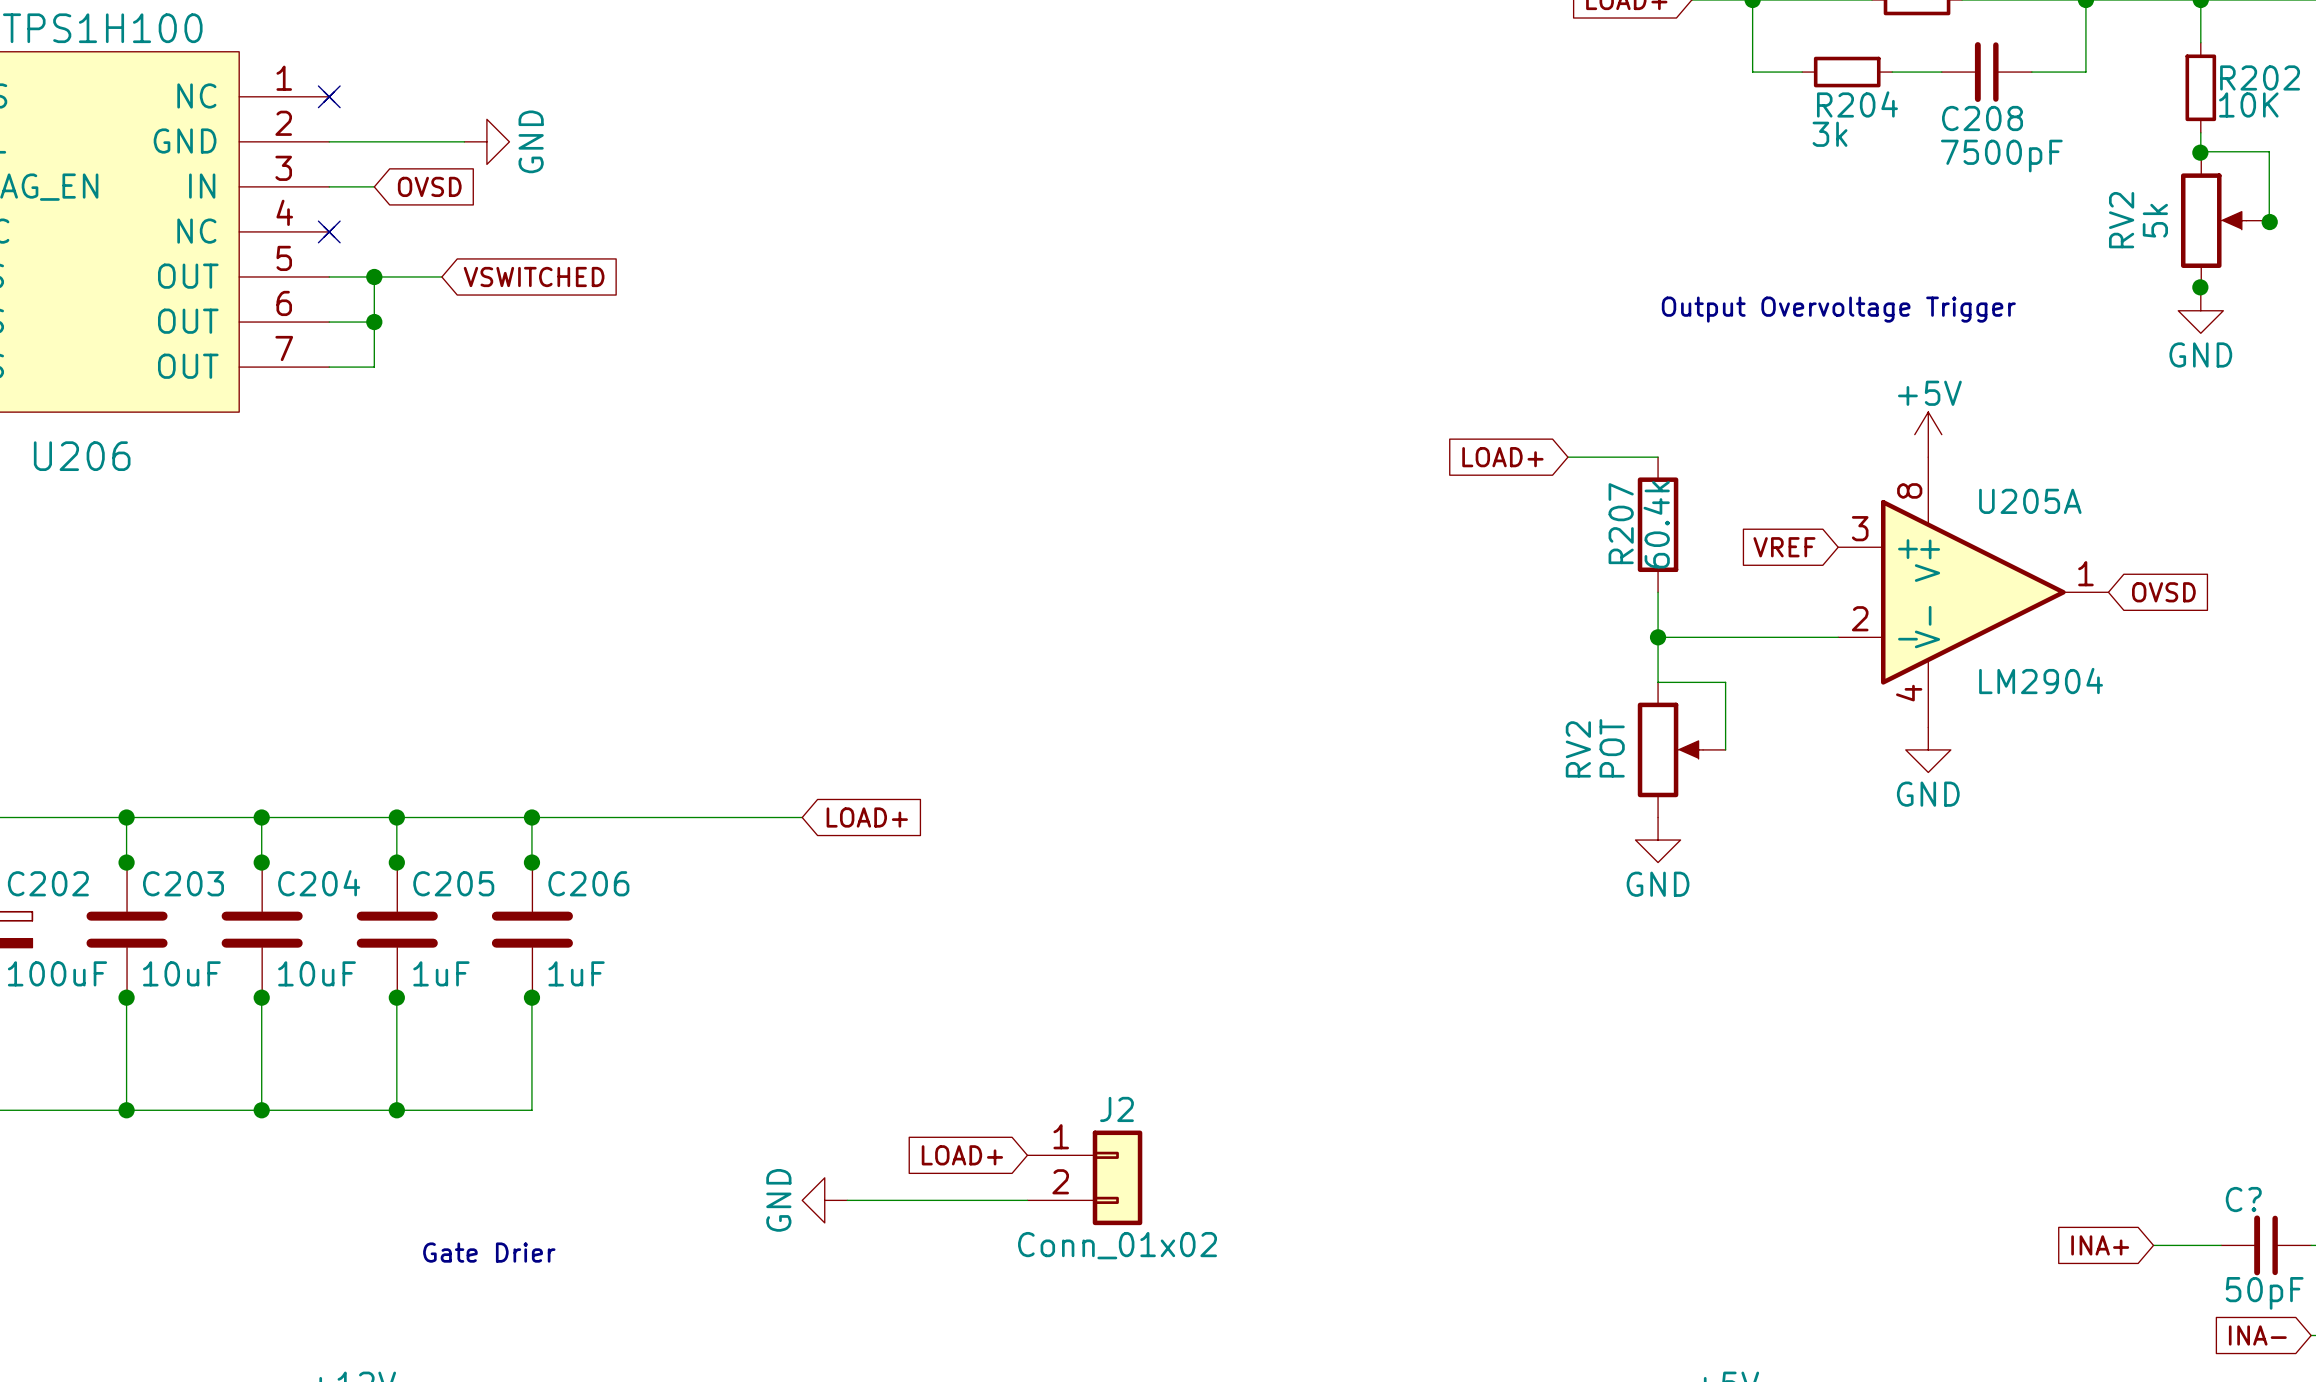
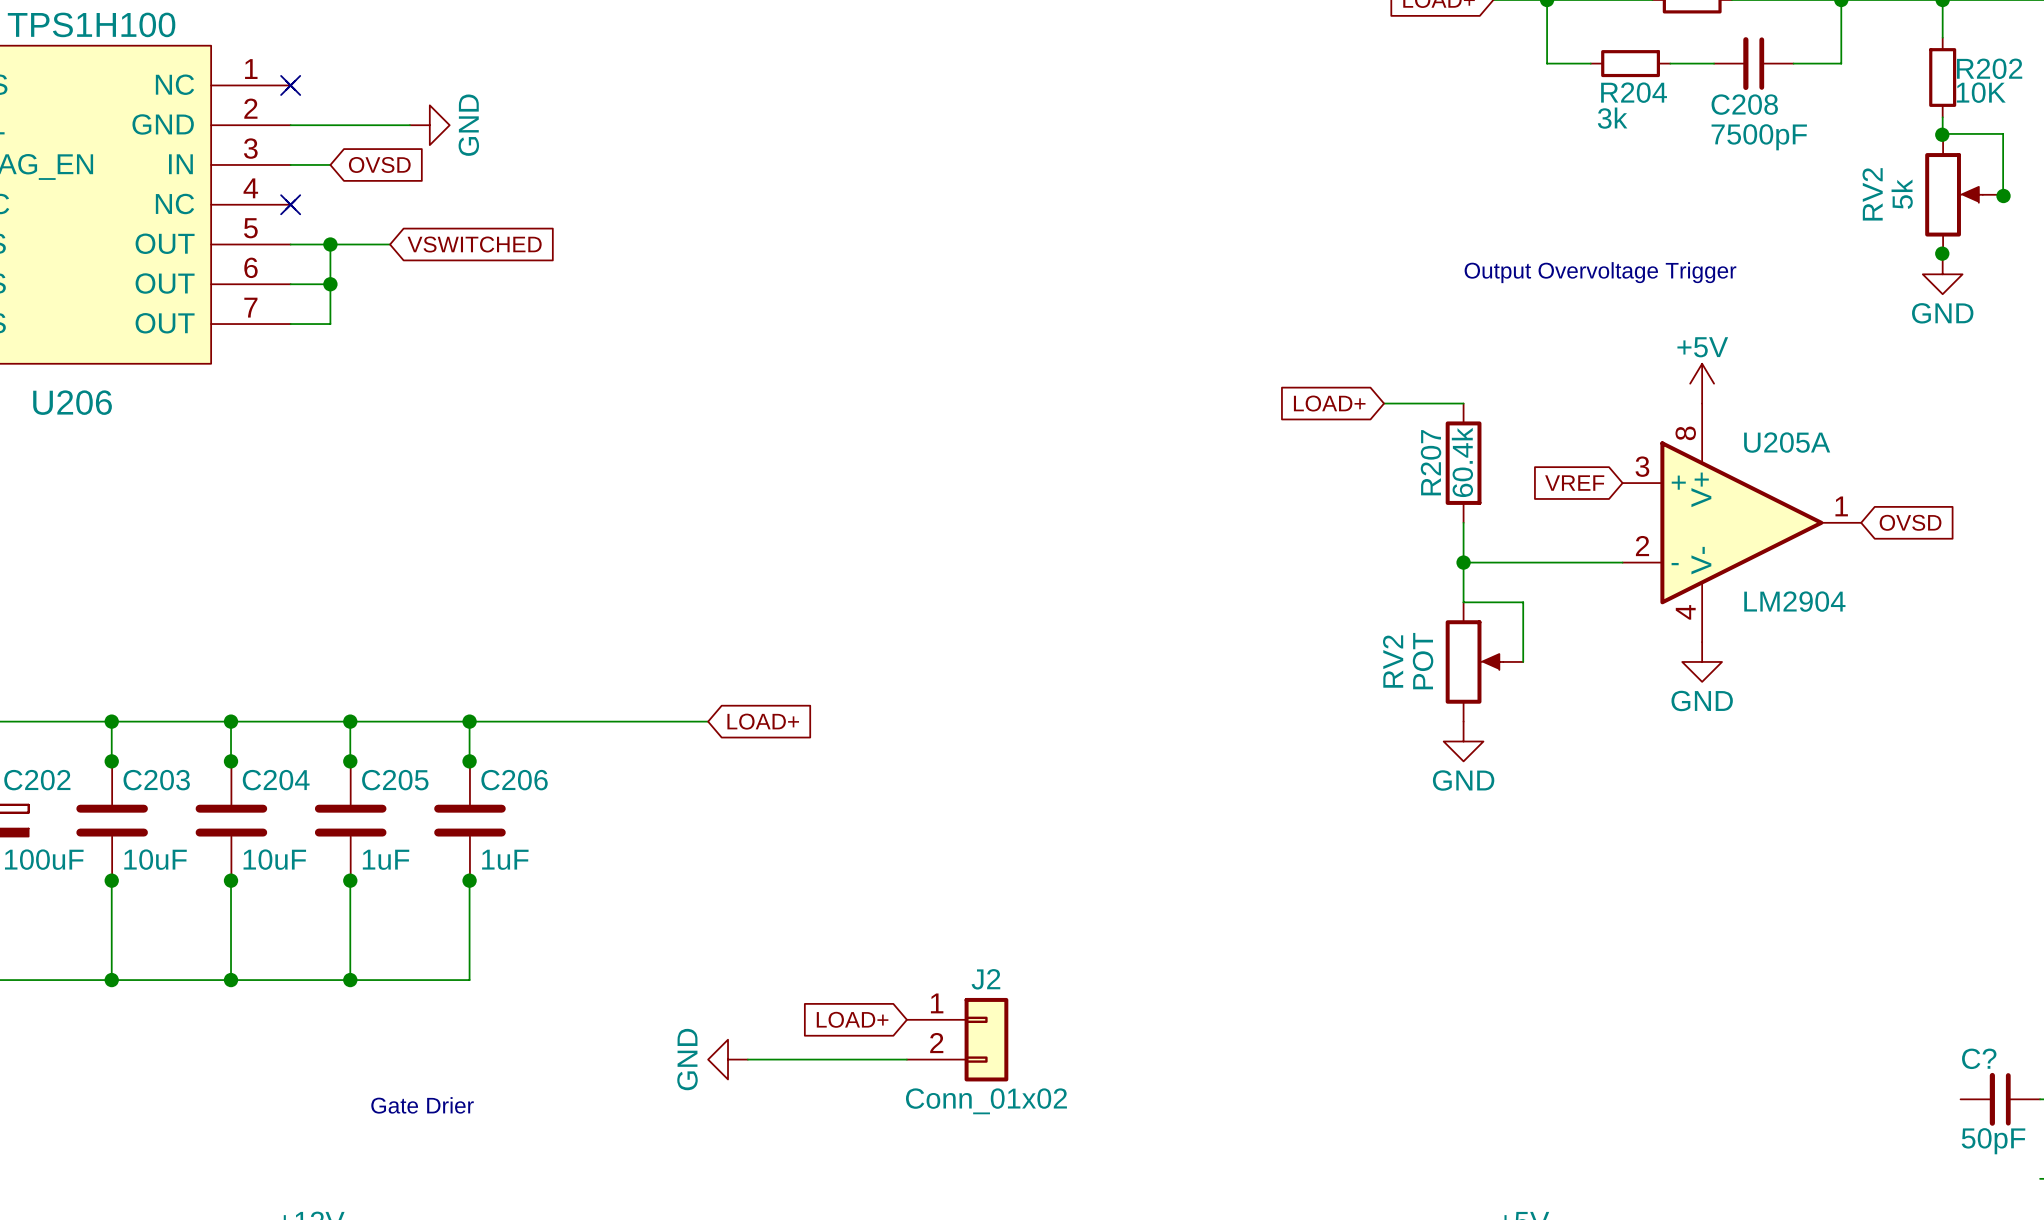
global label: INA+ (2100, 1245) -> none
wire: (2153, 1245) (2221, 1245) -> none
global label: INA- (2257, 1335) -> none

